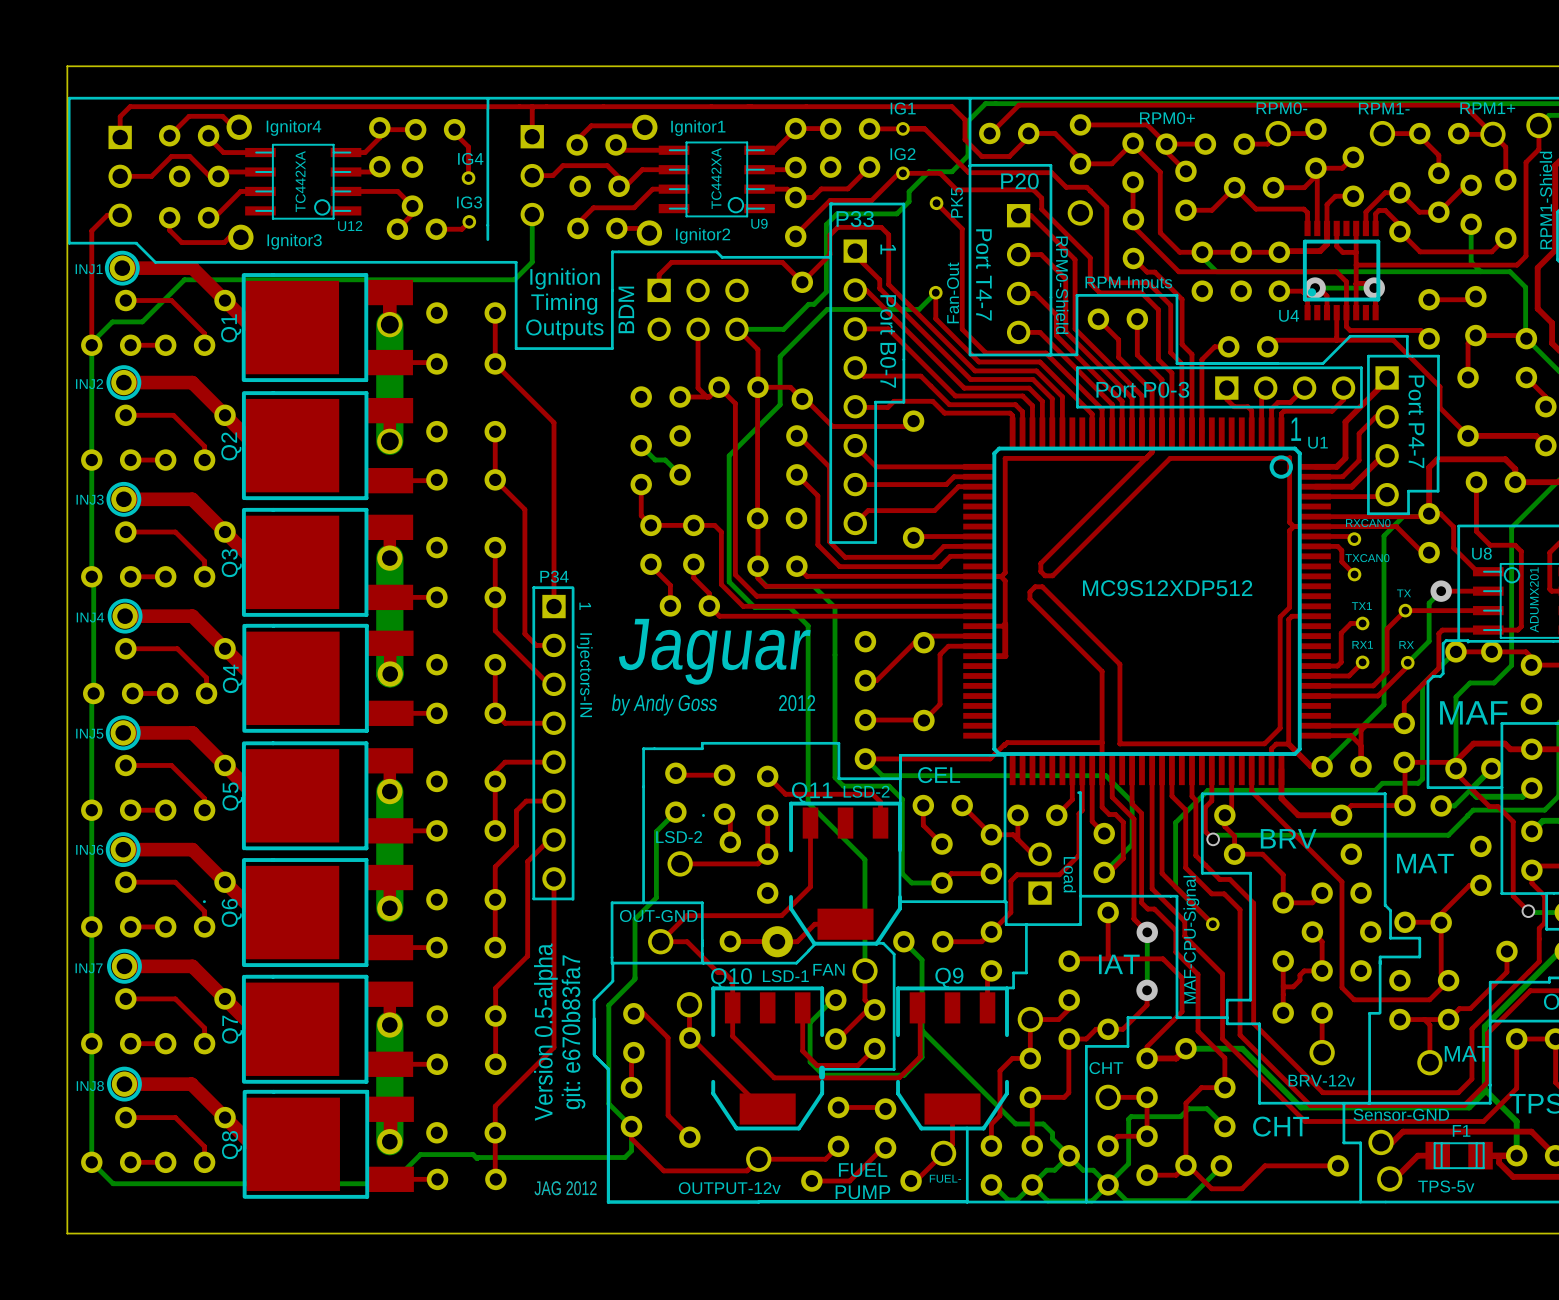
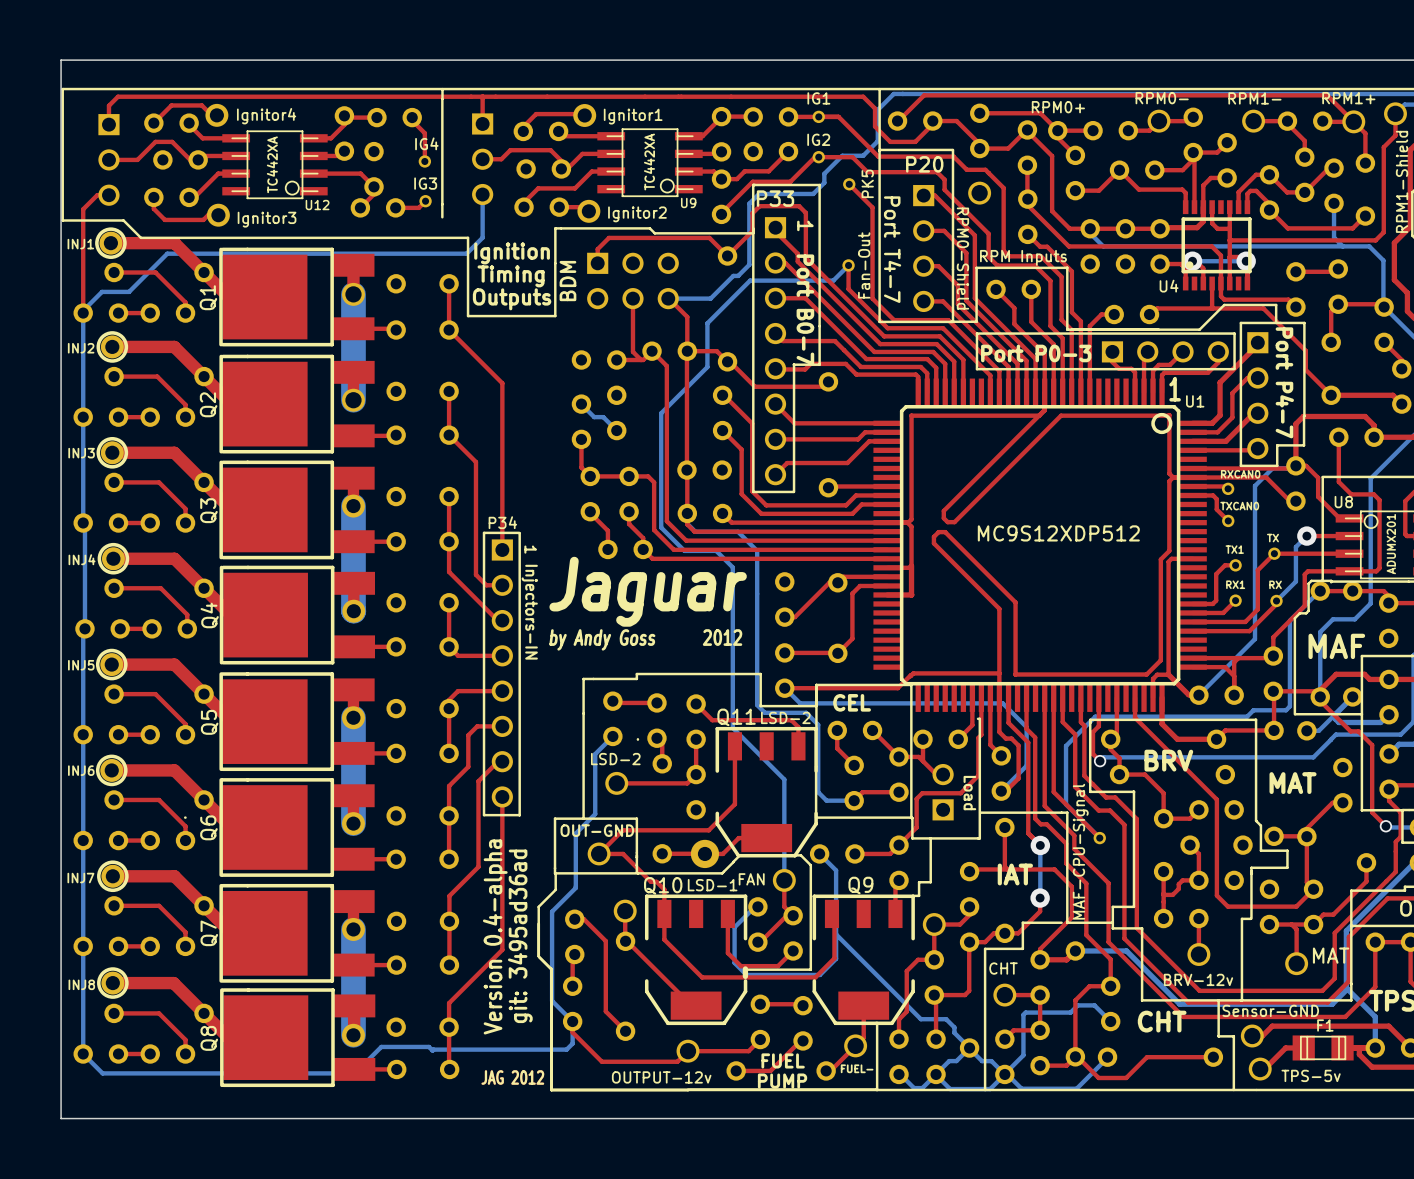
text: Version 0.5-alpha (545, 1032) -> Version 0.4-alpha (495, 936)
text: git: e670b83fa7 (573, 1032) -> git: 3495ad36ad (520, 936)

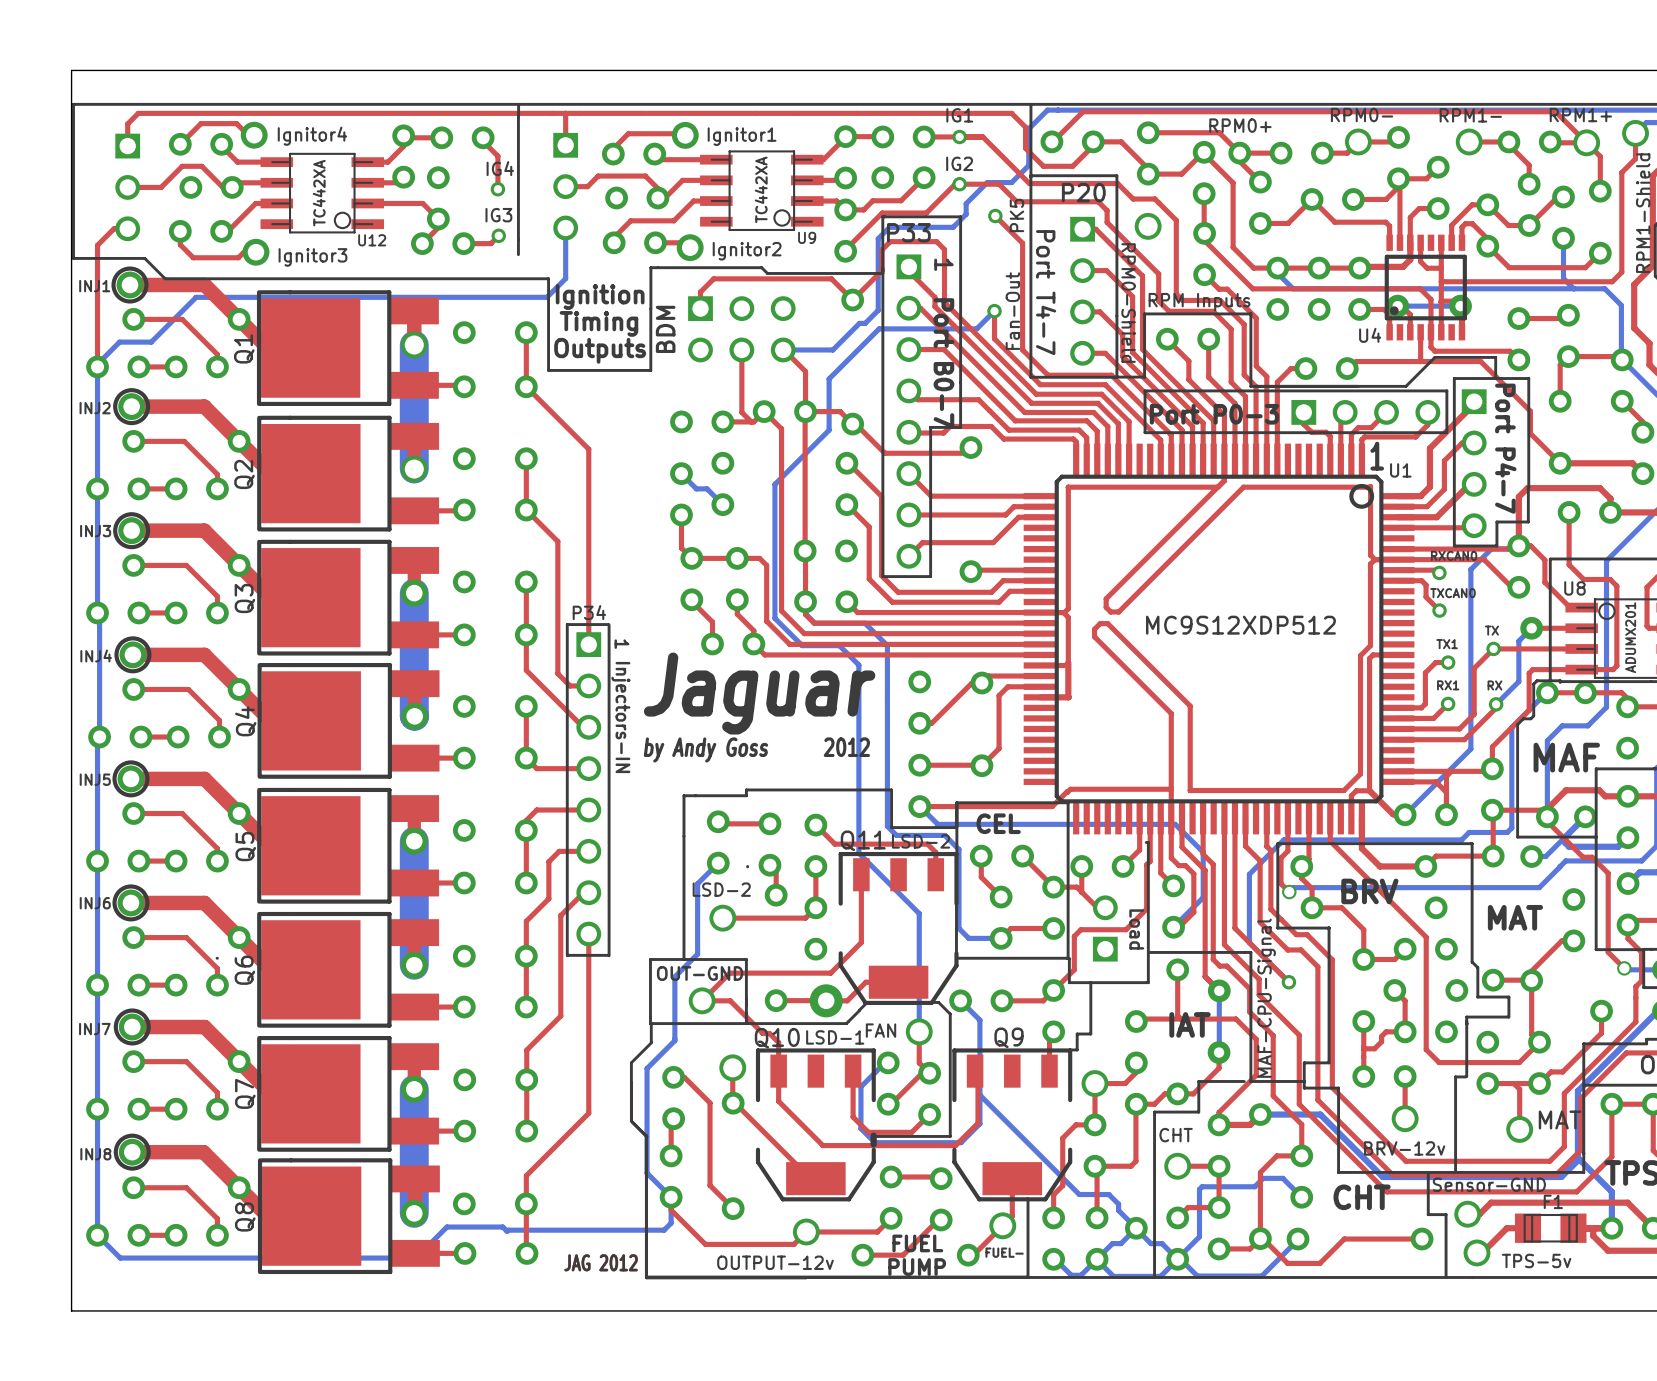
text: Version 0.4-alpha (495, 936) -> none
text: git: 3495ad36ad (520, 936) -> none

